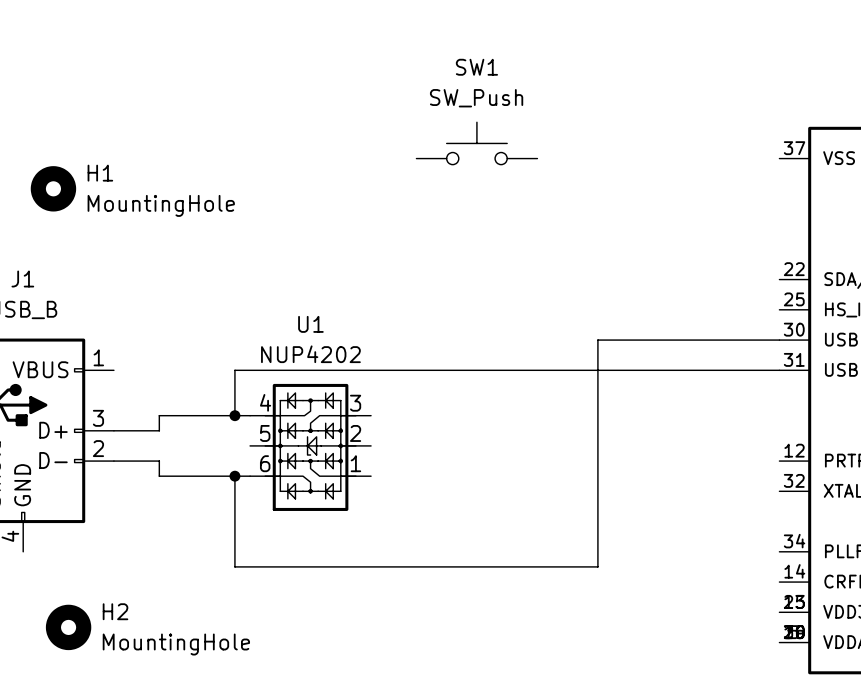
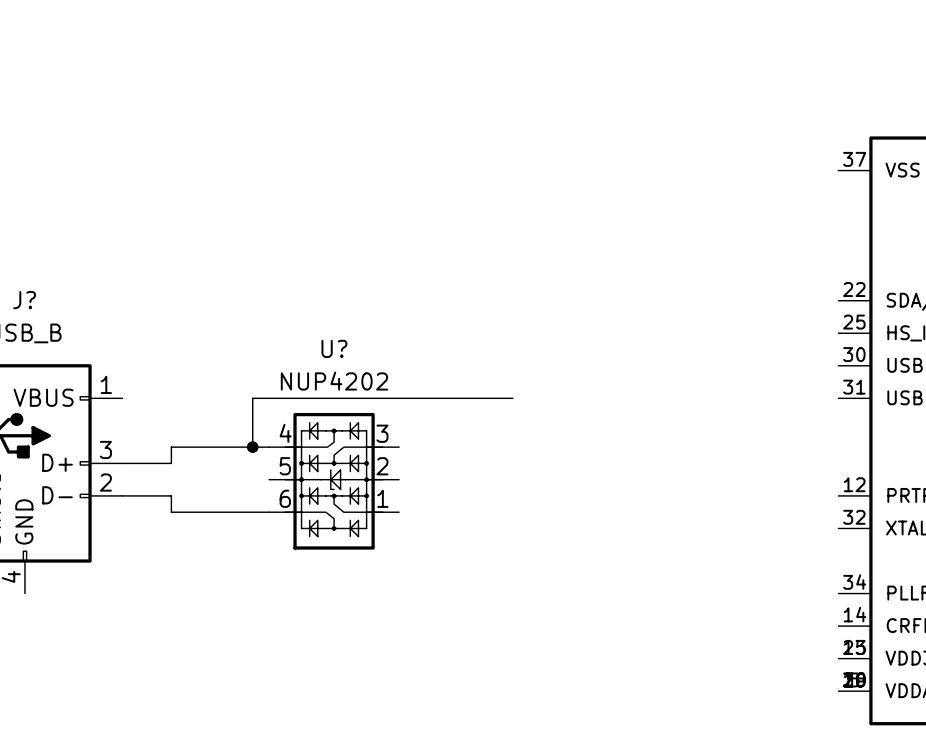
SW1: SW_Push (476, 143) -> none
H1: MountingHole (53, 188) -> none
J1 name: J1 (22, 279) -> J? (24, 300)
U1 name: U1 (310, 324) -> U? (334, 348)
wire: (779, 340) (597, 340) (597, 566) (234, 566) (234, 476) -> none
wire: (476, 370) (779, 370) -> none
junction: (234, 476) -> none
H2: MountingHole (68, 627) -> none

